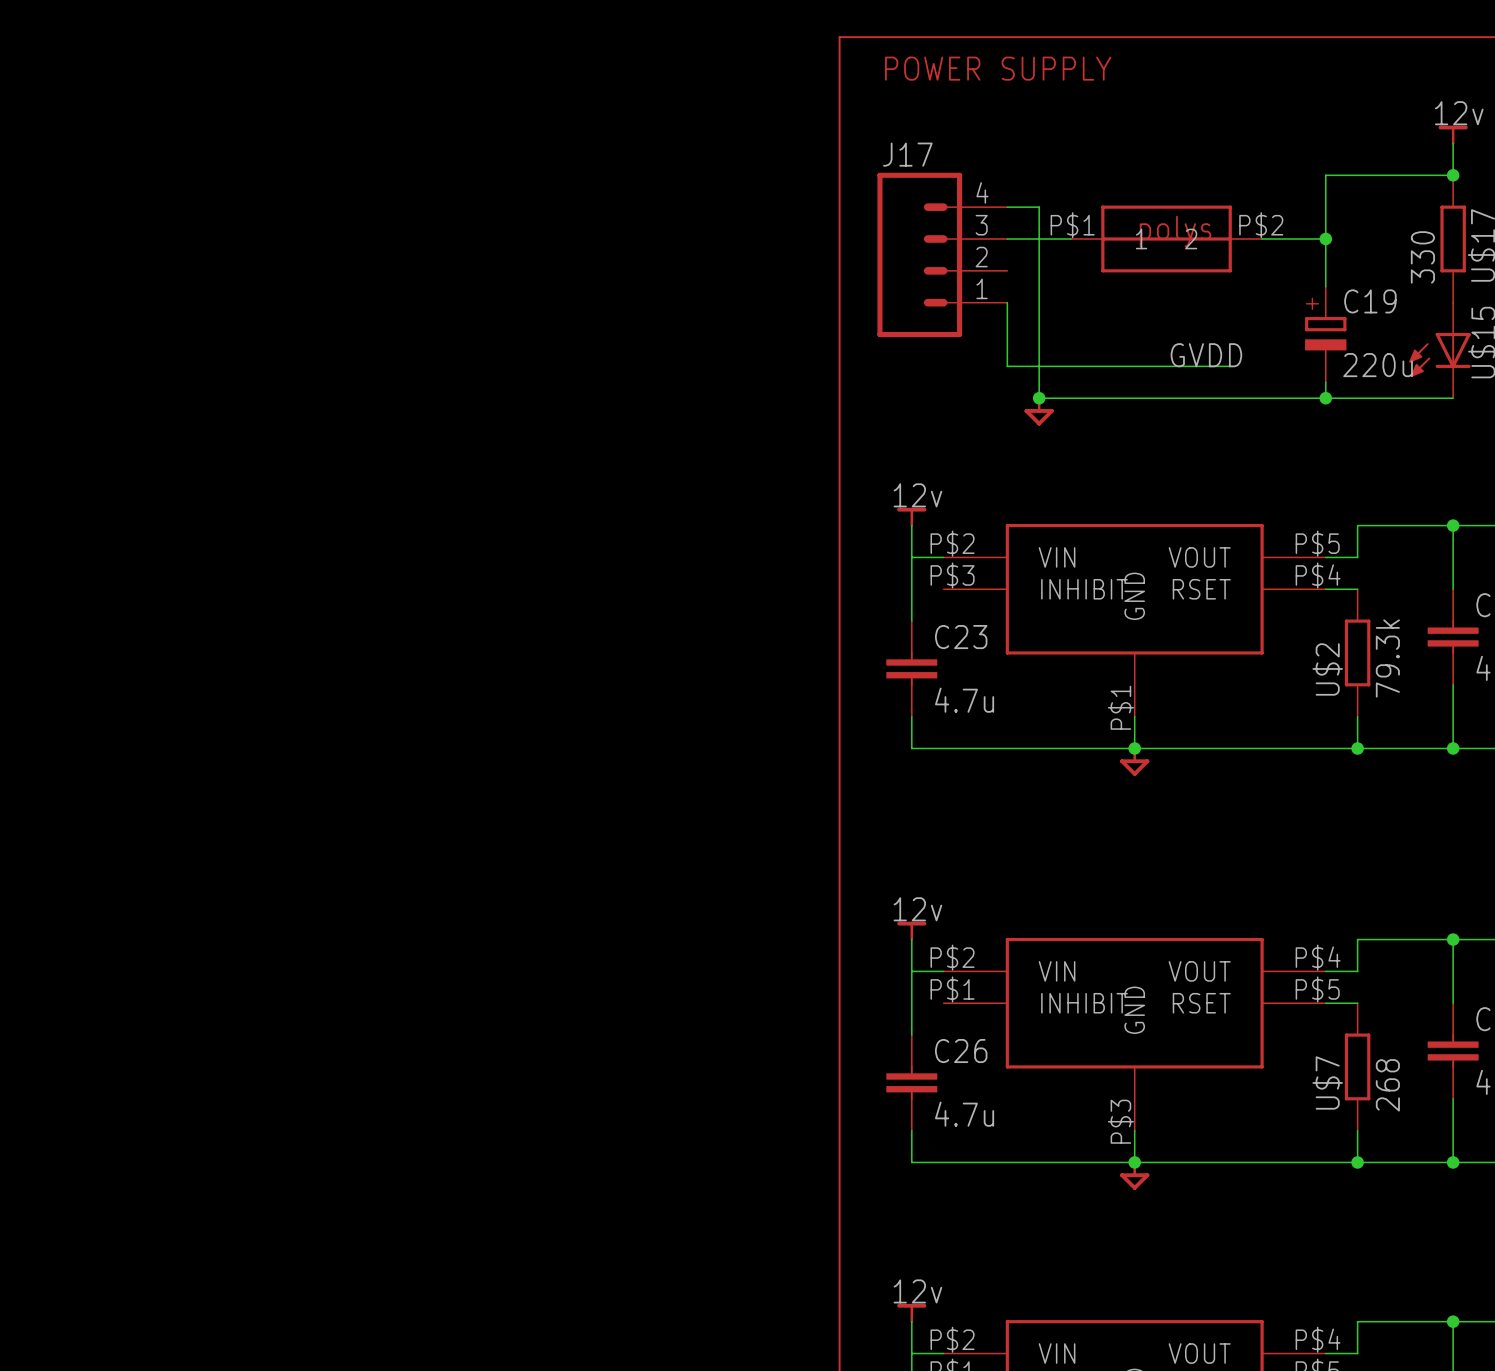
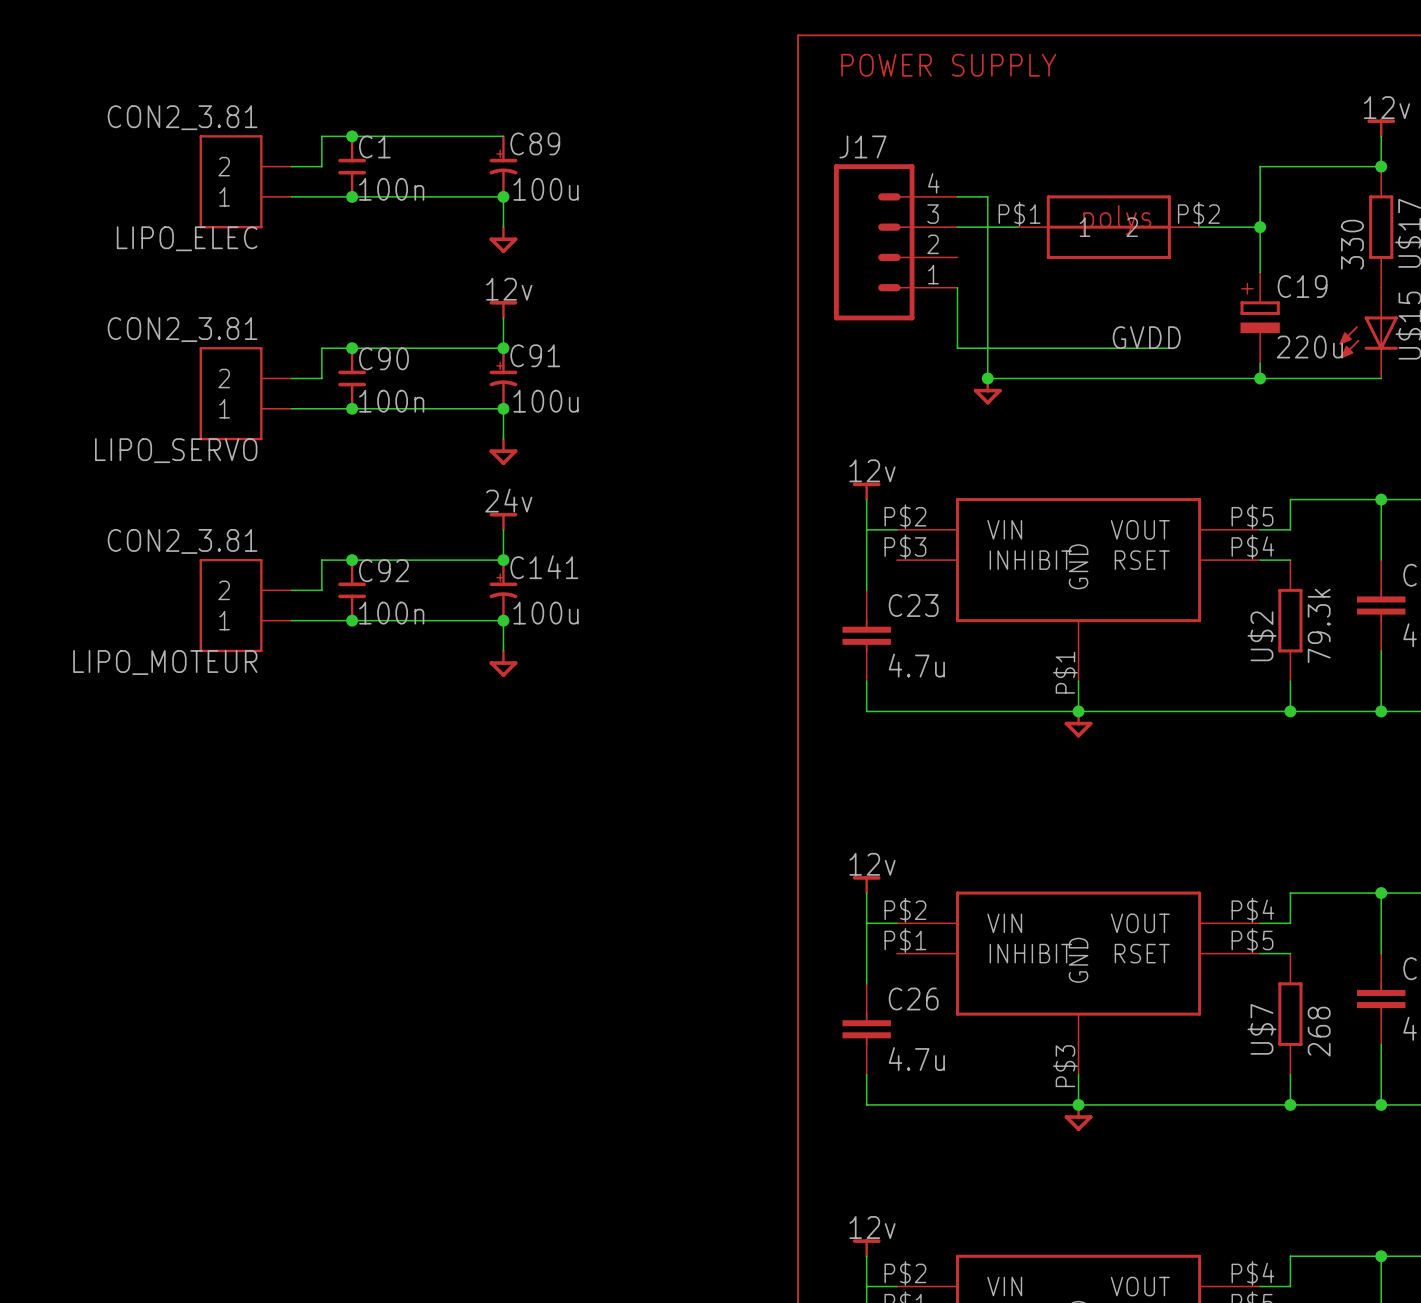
junction: none -> (352, 136)
wire: none -> (503, 136) (321, 136) (321, 166) (291, 166)
C1: none -> 100n (352, 166)
C89: none -> 100u (503, 166)
LIPO_ELEC: none -> CON2_3.81 (245, 181)
wire: none -> (291, 196) (503, 196) (503, 227)
junction: none -> (352, 196)
junction: none -> (503, 196)
power symbol: none -> (503, 239)
power symbol: none -> (503, 310)
wire: none -> (503, 317) (503, 348) (321, 348) (321, 378) (291, 378)
junction: none -> (352, 348)
junction: none -> (503, 348)
C90: none -> 100n (352, 378)
C91: none -> 100u (503, 378)
LIPO_SERVO: none -> CON2_3.81 (245, 393)
wire: none -> (291, 408) (503, 408) (503, 439)
junction: none -> (352, 408)
junction: none -> (503, 408)
power symbol: none -> (503, 451)
power symbol: none -> (503, 521)
wire: none -> (503, 529) (503, 560) (321, 560) (321, 590) (291, 590)
junction: none -> (352, 560)
junction: none -> (503, 560)
C92: none -> 100n (352, 590)
C141: none -> 100u (503, 590)
LIPO_MOTEUR: none -> CON2_3.81 (245, 605)
wire: none -> (291, 620) (503, 620) (503, 650)
junction: none -> (352, 620)
junction: none -> (503, 620)
power symbol: none -> (503, 663)

